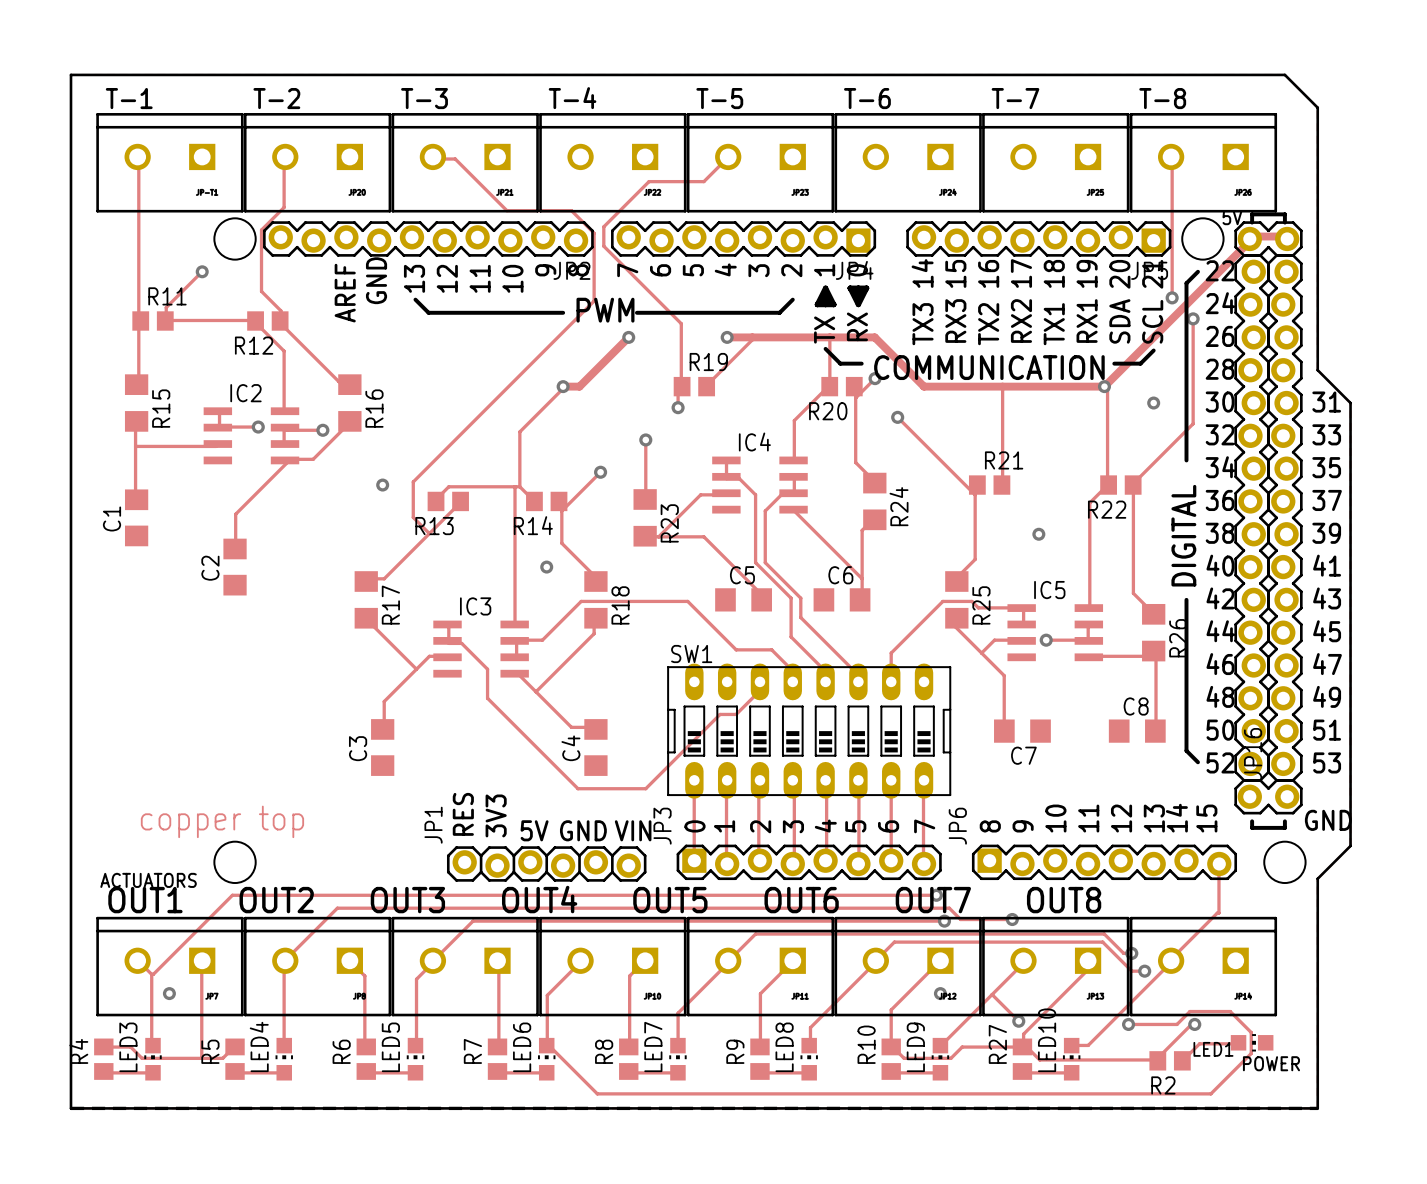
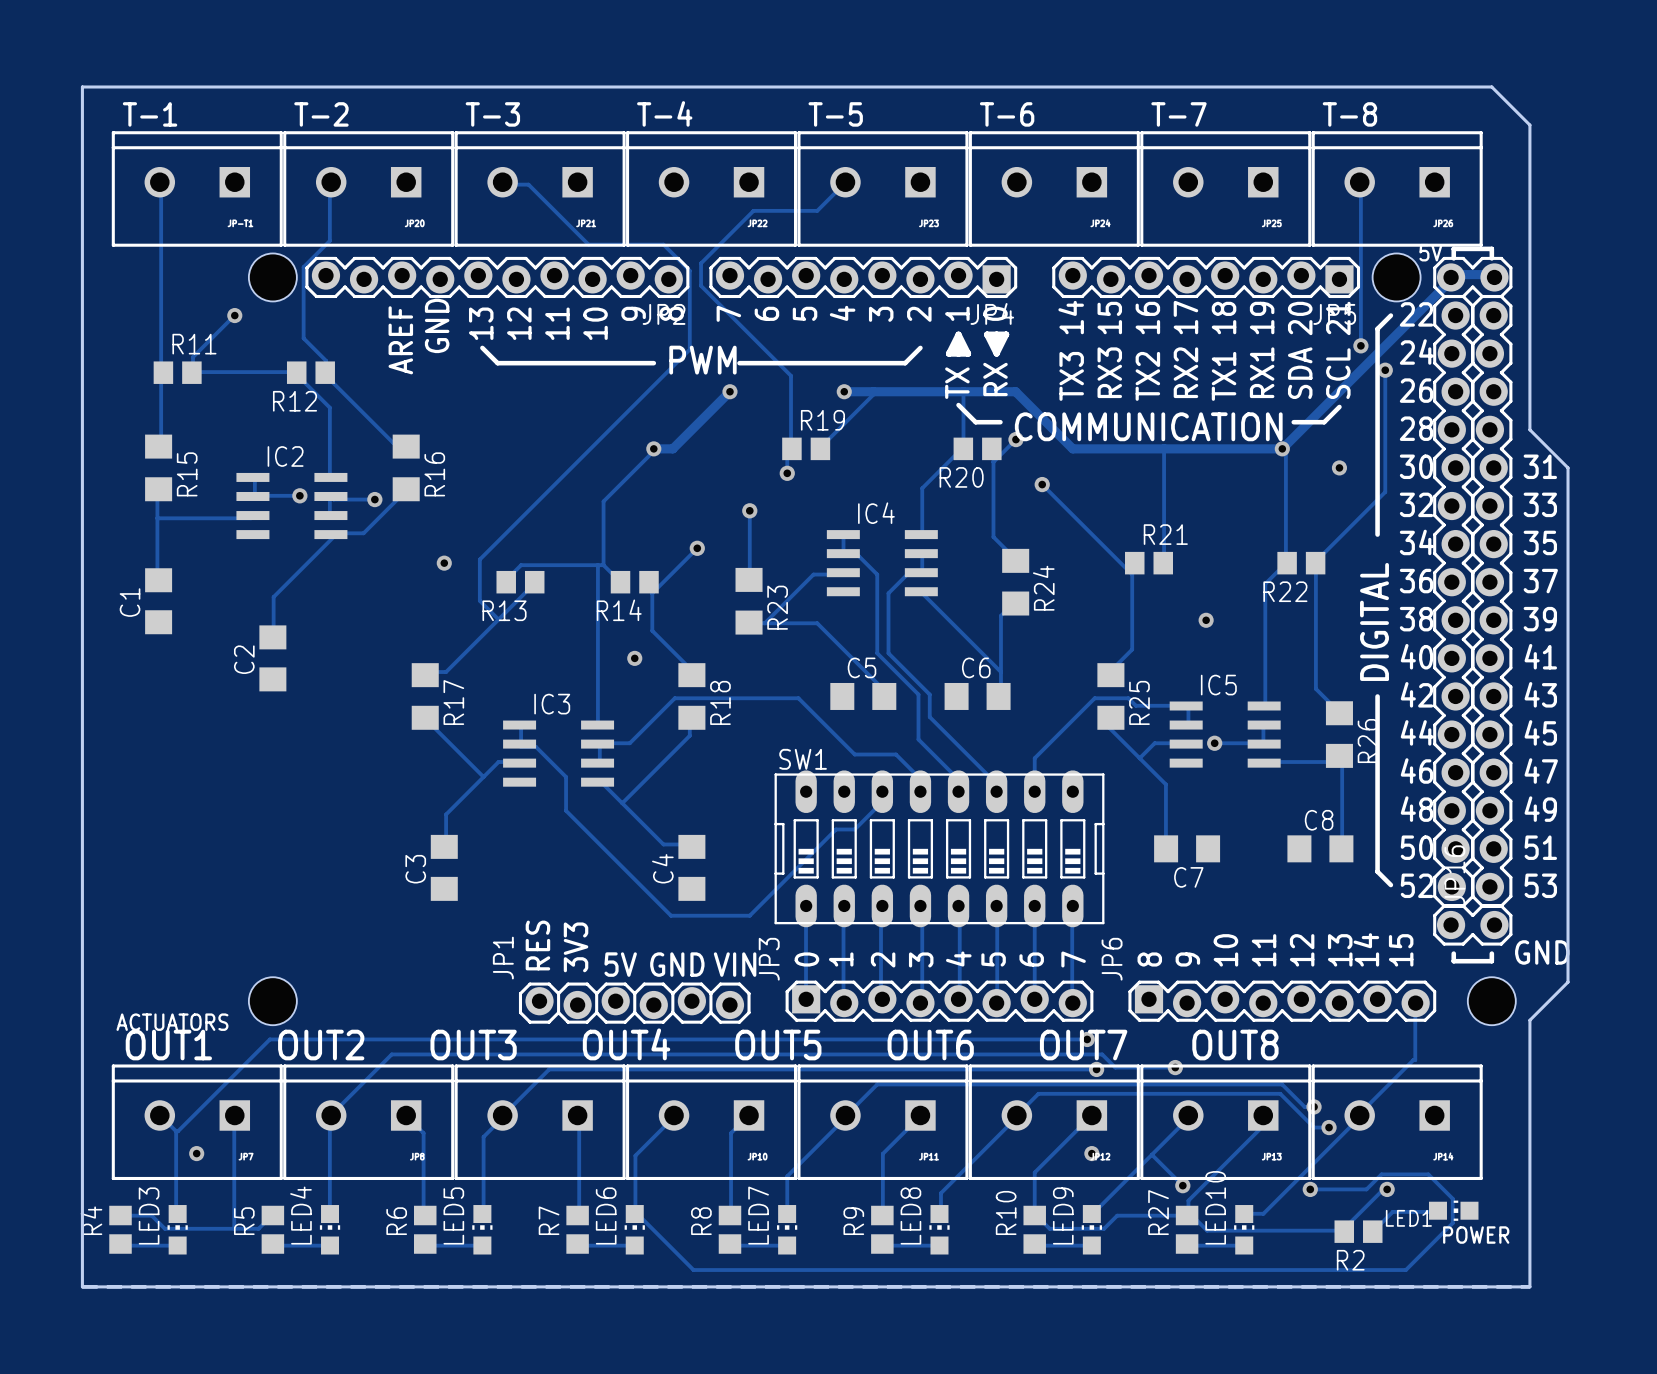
text: copper top (222, 821) -> none

